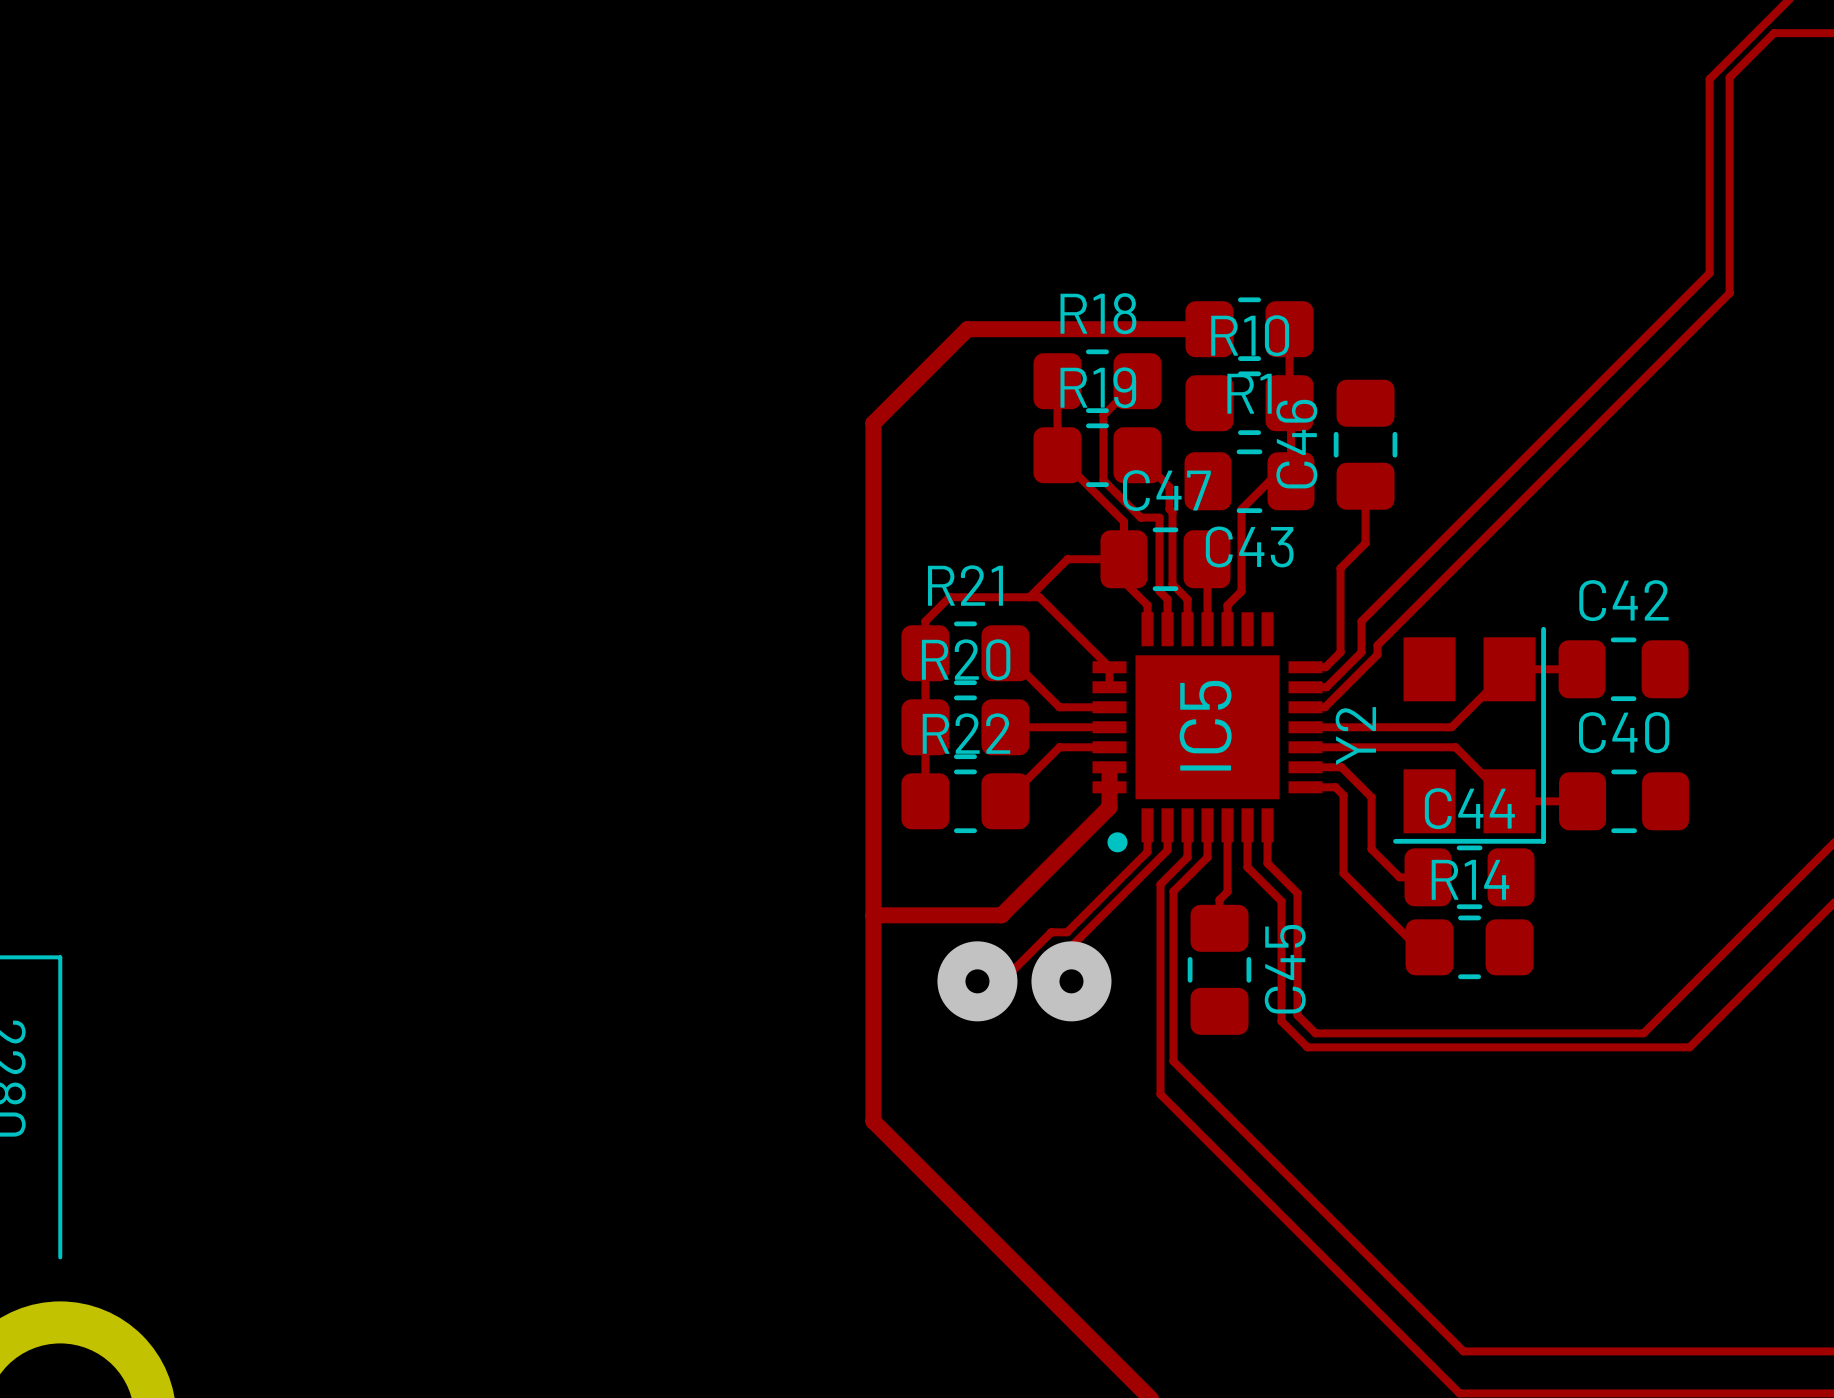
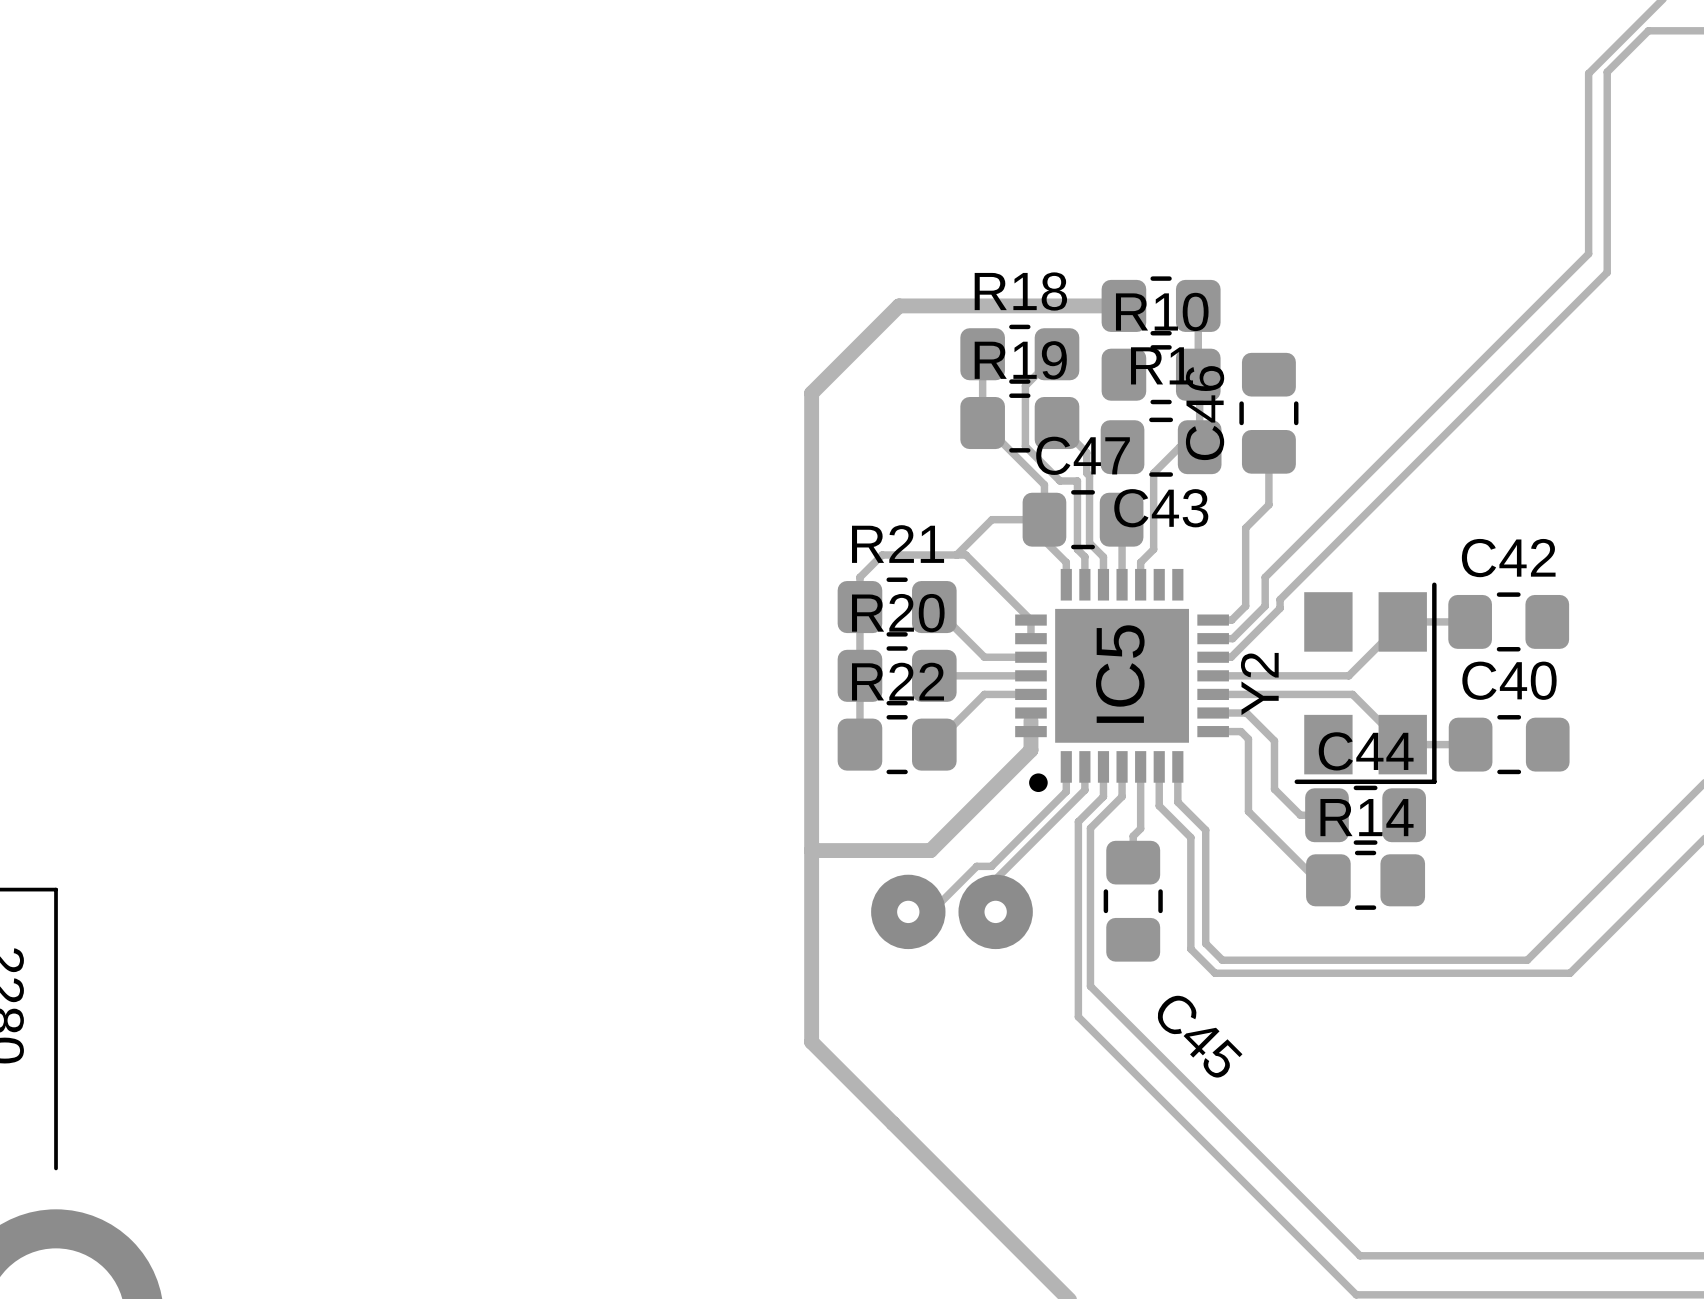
C45 name rotation: 0° (1285, 969) -> 135° clockwise (1199, 1036)
C45 name position: C45 (1285, 969) -> C45 (1199, 1036)

